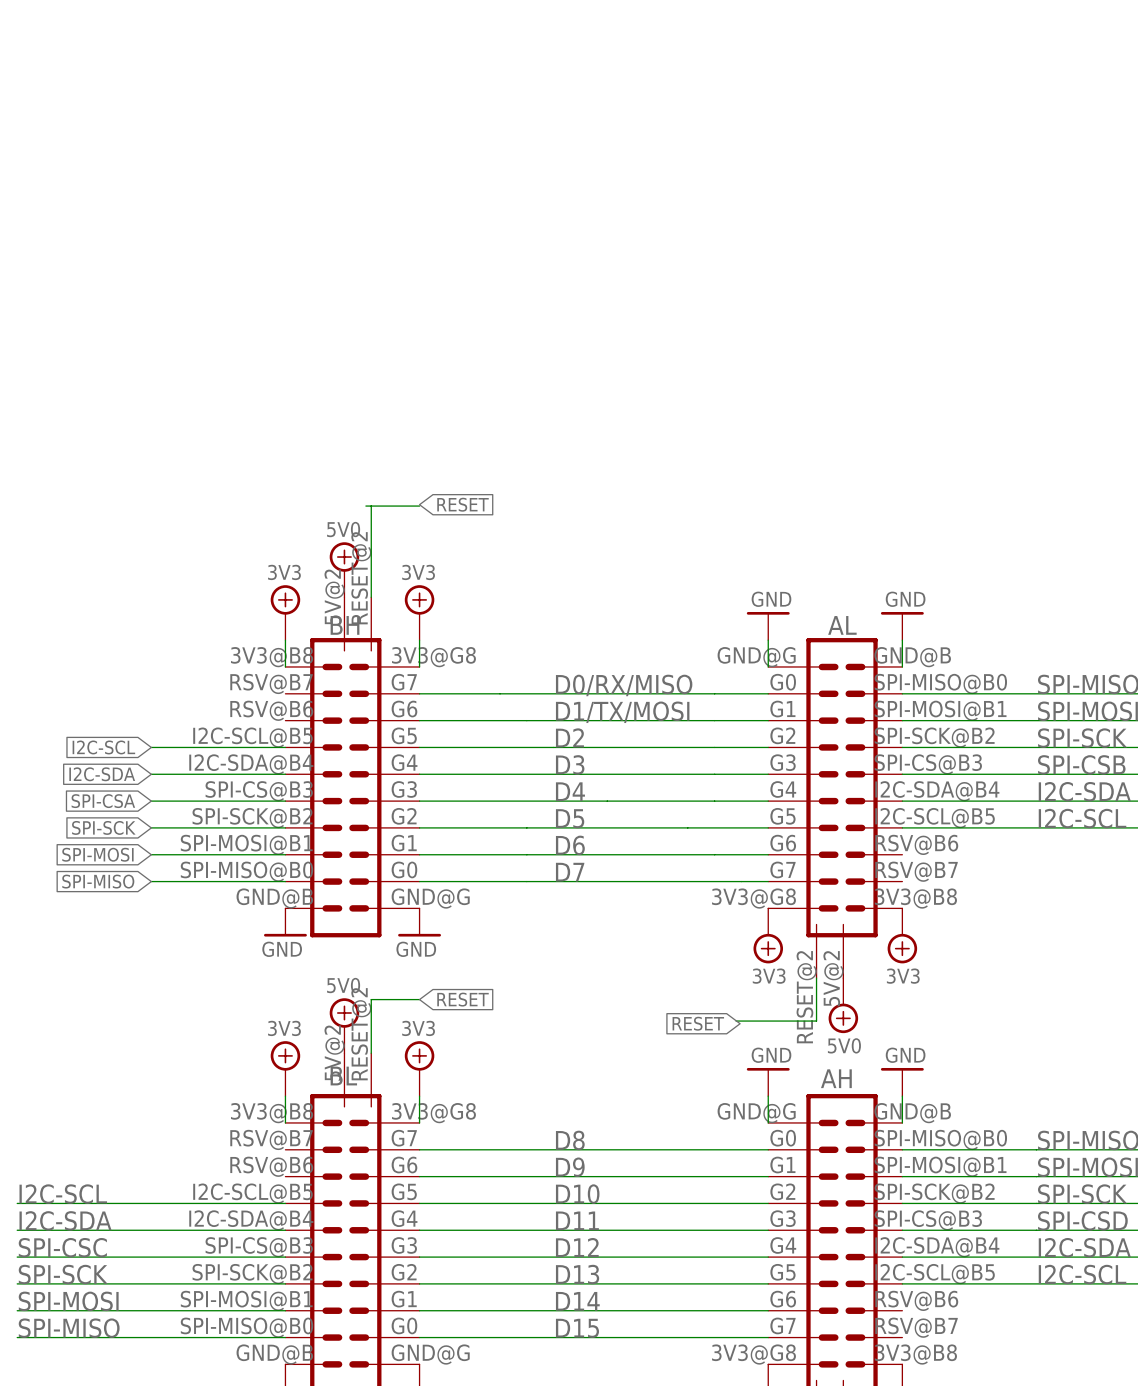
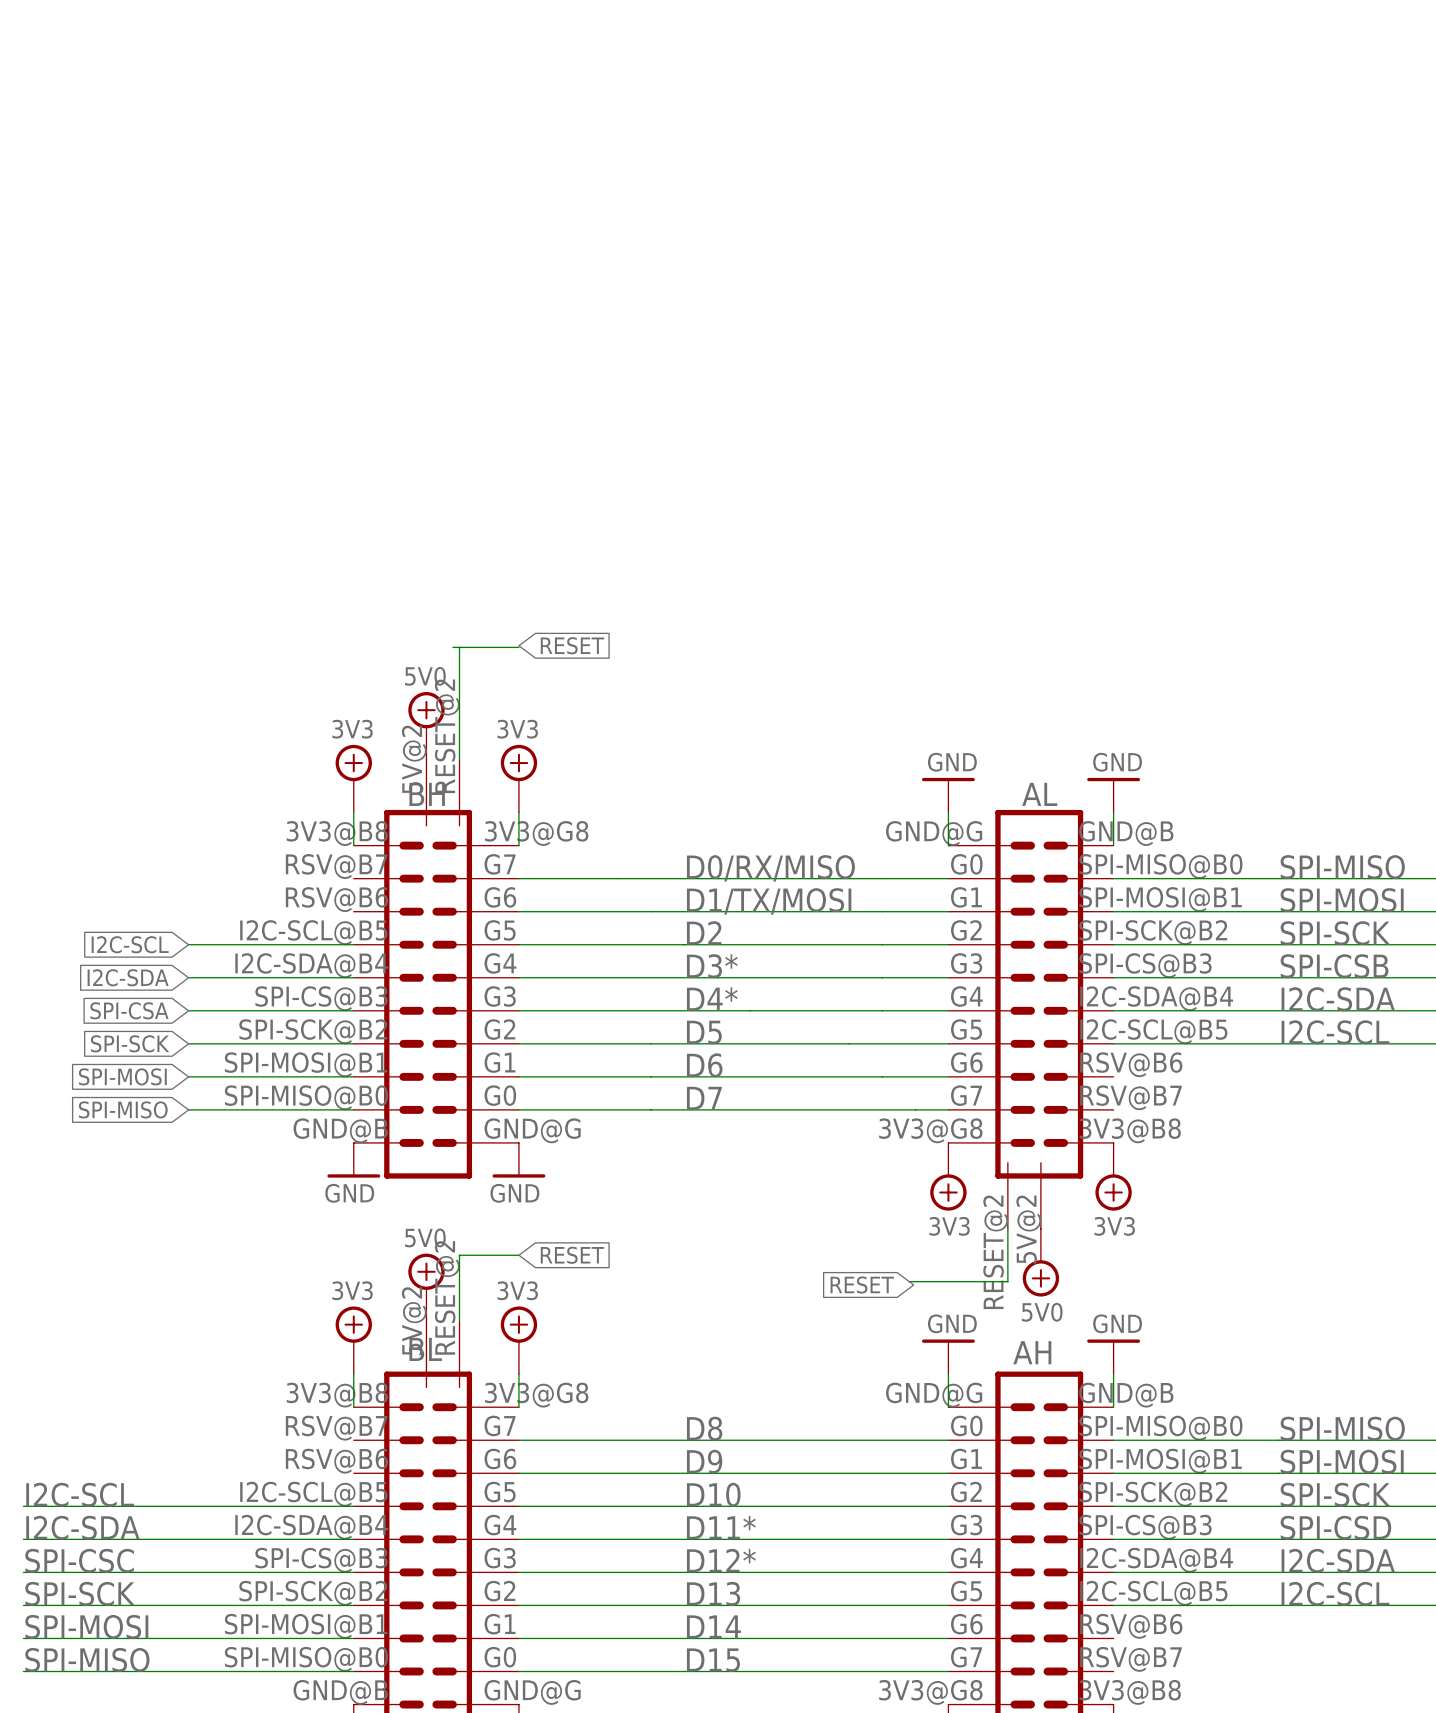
label: D3 (570, 764) -> D3* (712, 966)
label: D4 (570, 791) -> D4* (712, 999)
label: D11 (577, 1220) -> D11* (721, 1527)
label: D12 (577, 1247) -> D12* (721, 1560)

